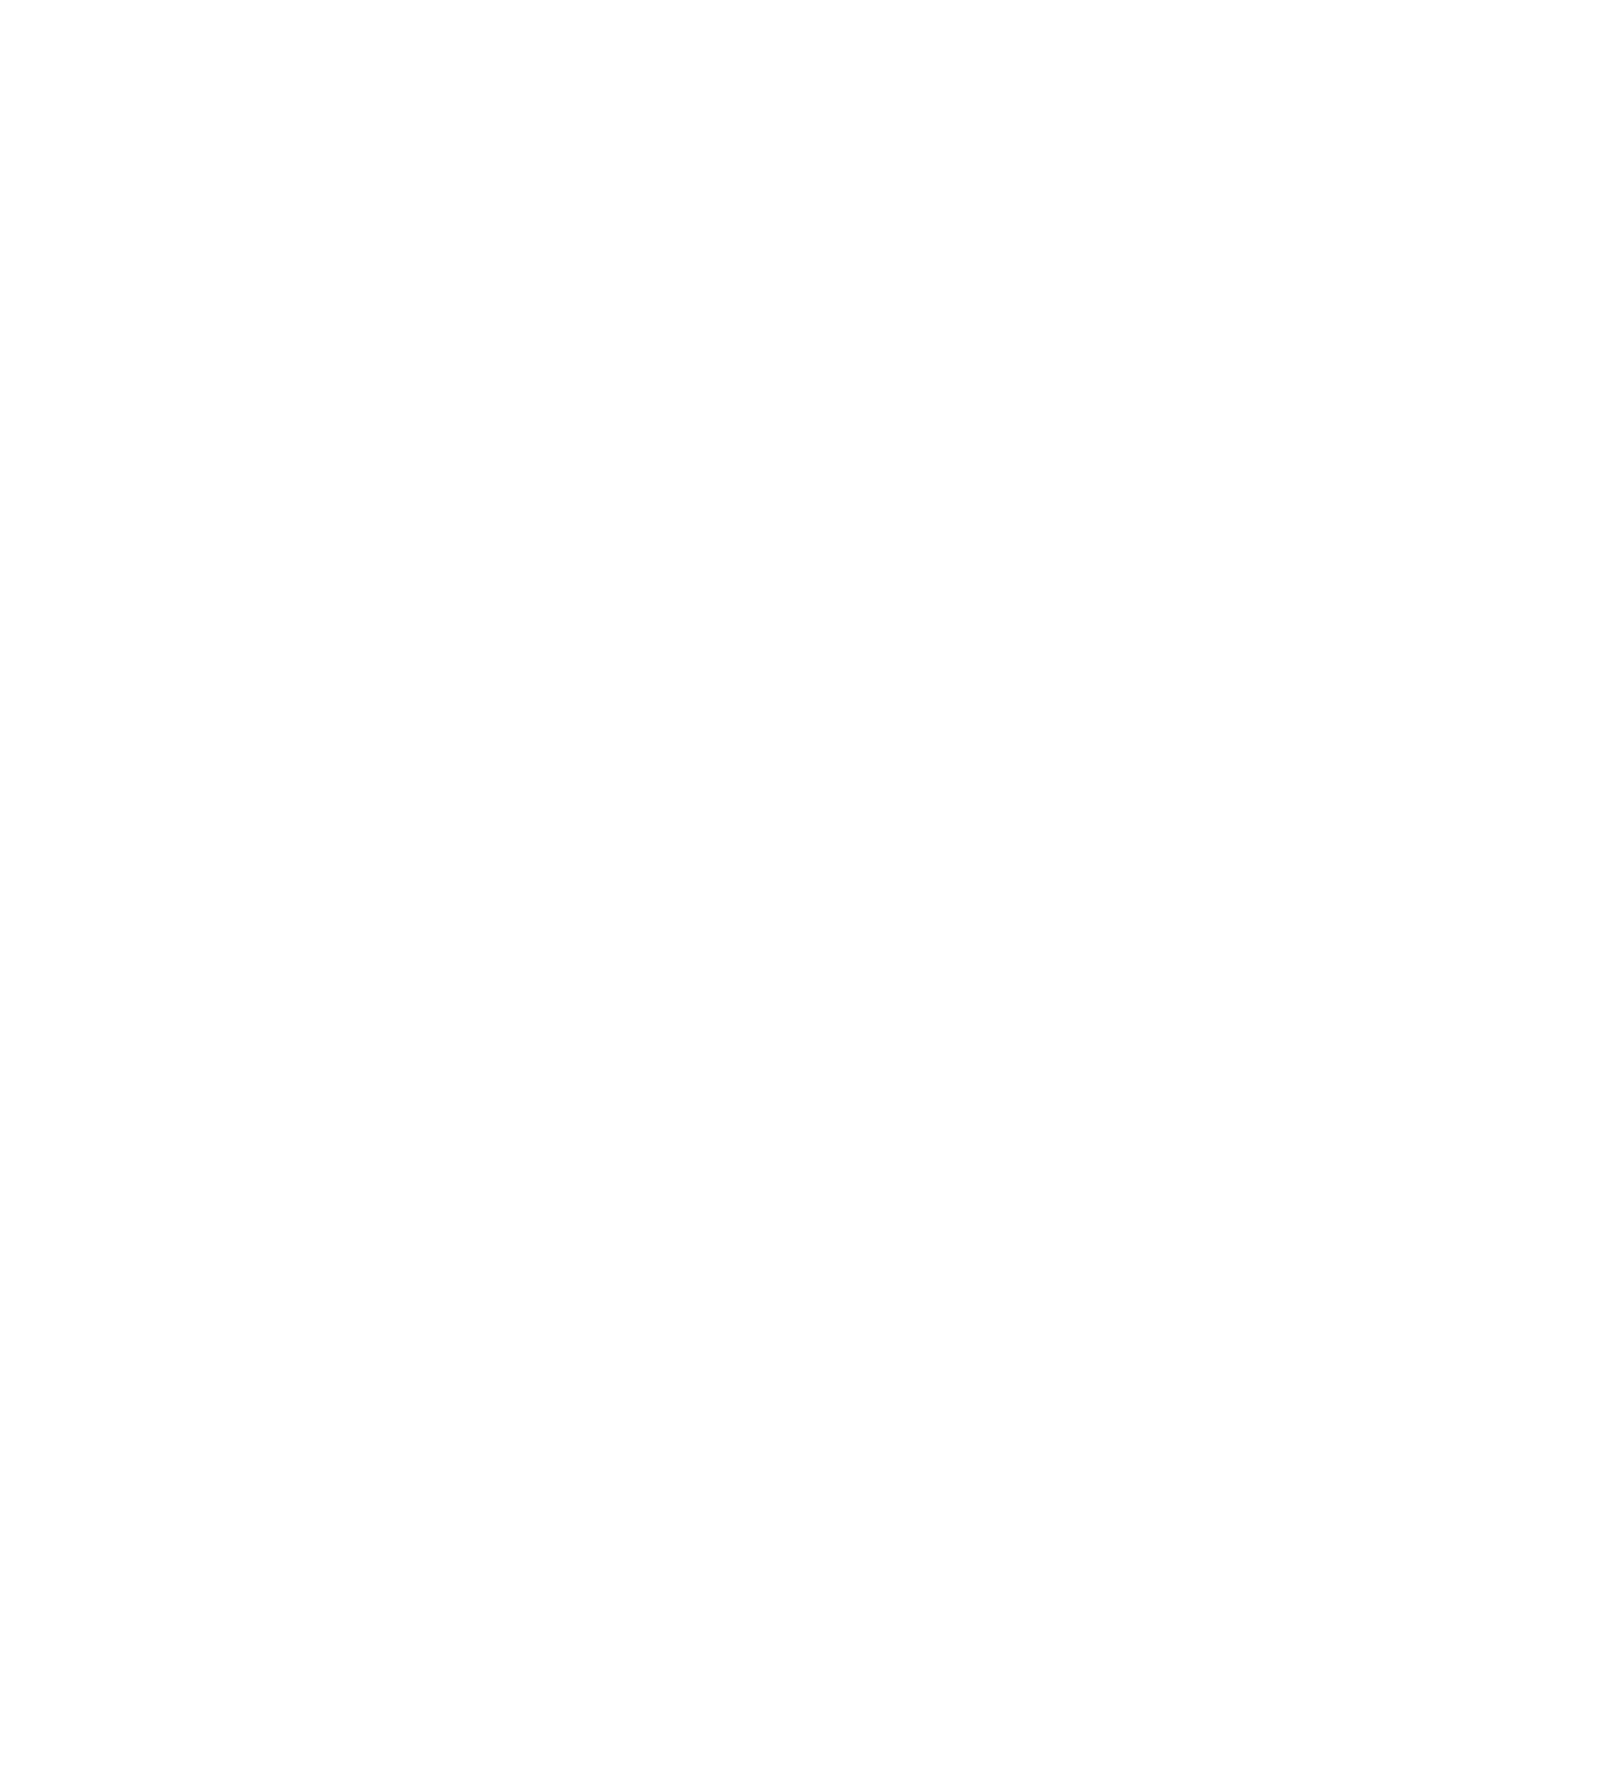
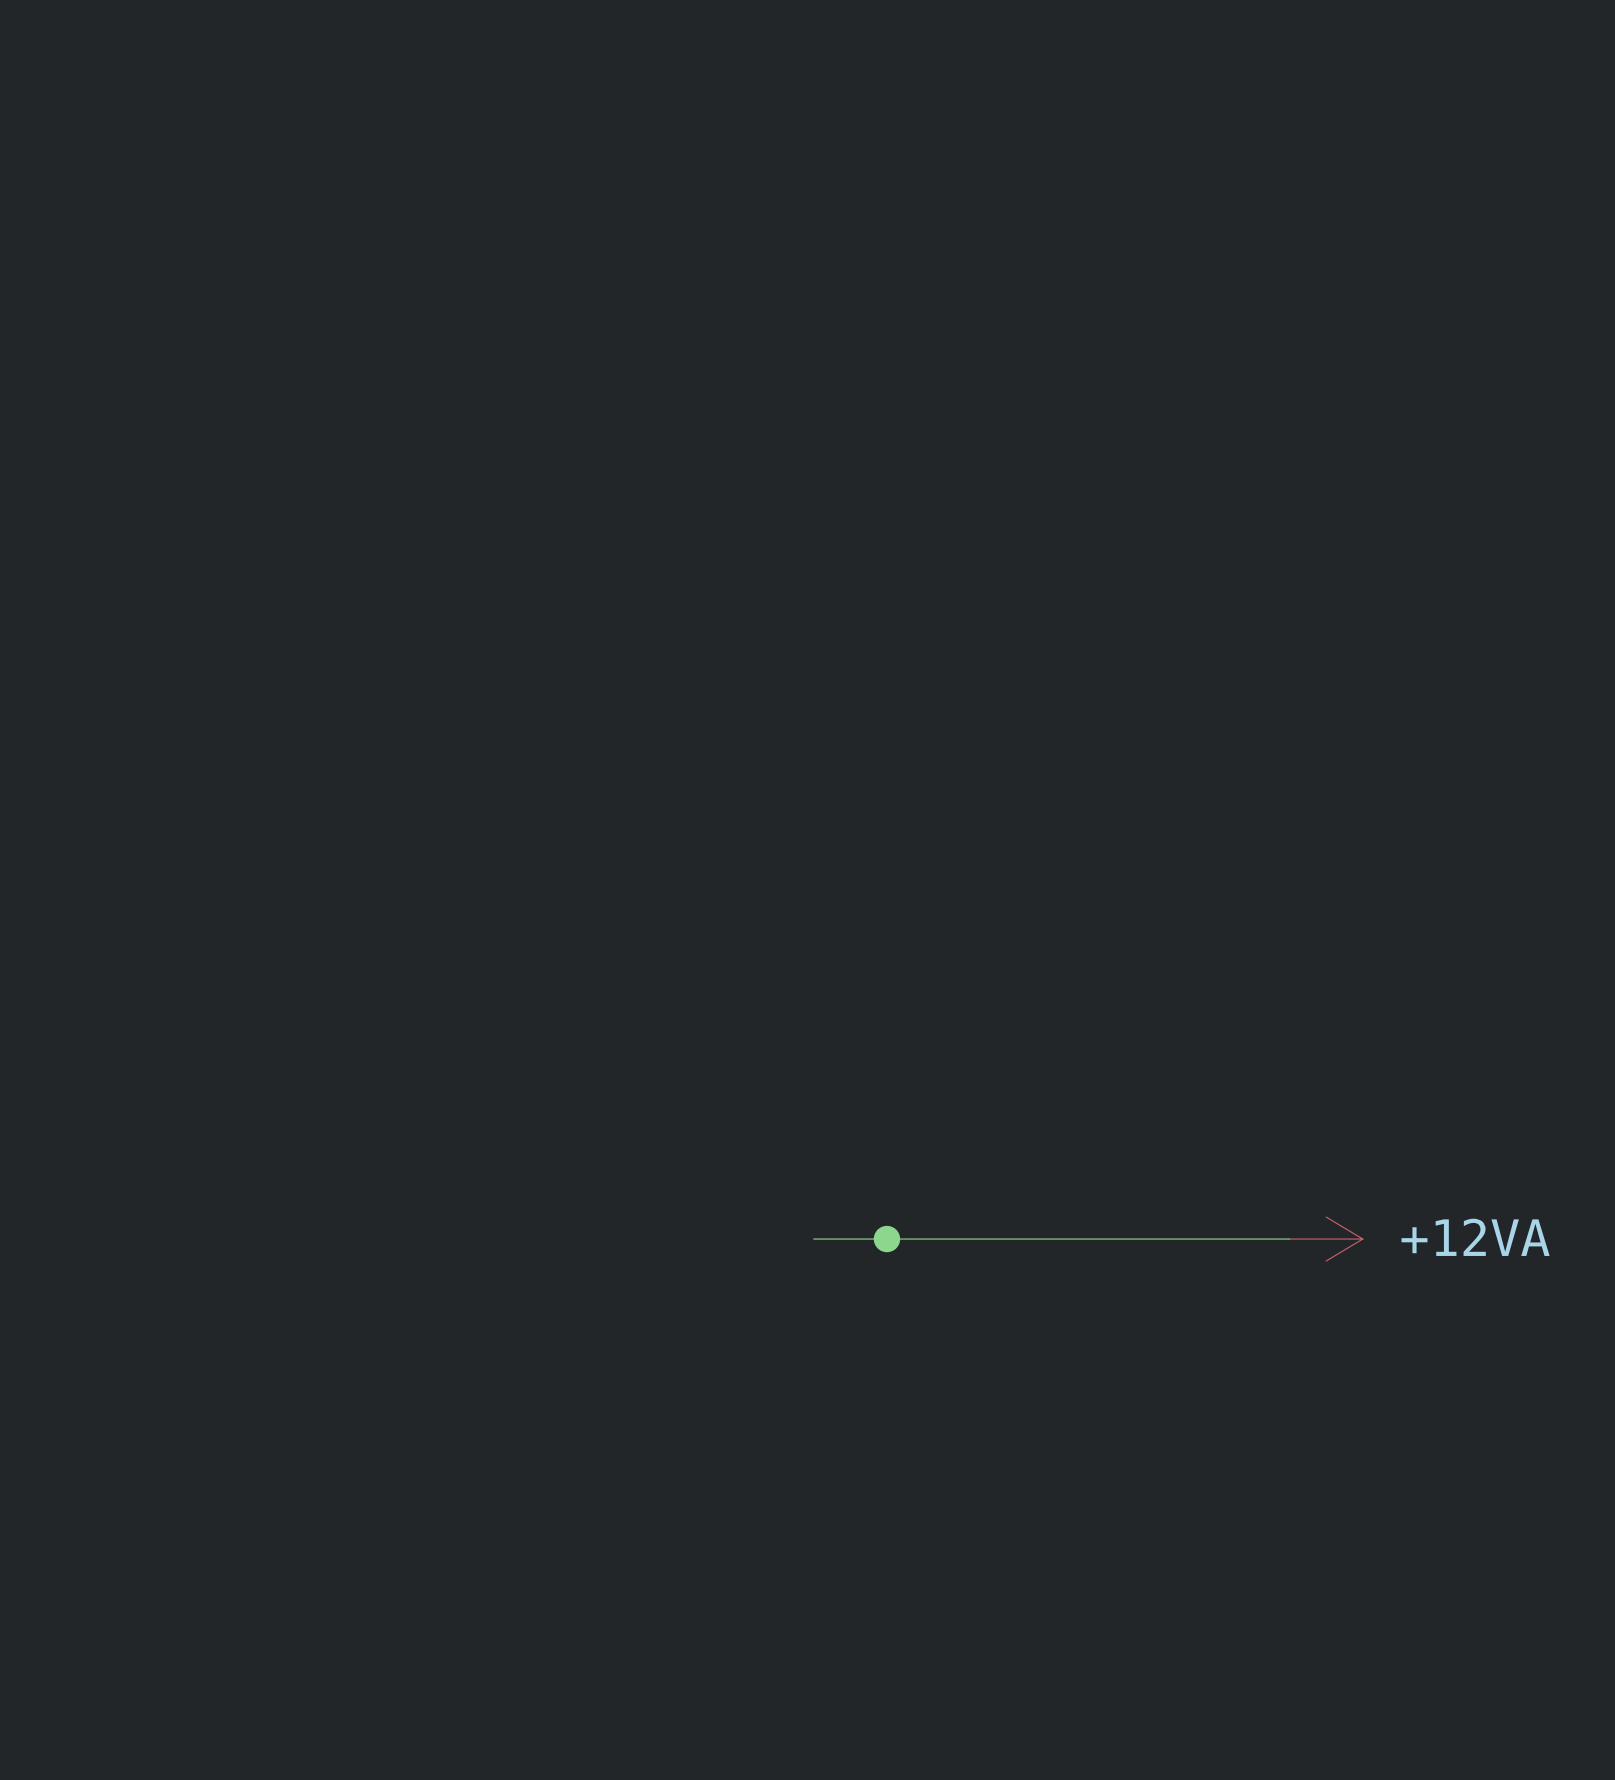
wire: none -> (813, 1239) (1289, 1239)
junction: none -> (886, 1239)
power symbol: none -> +12VA (1326, 1239)

